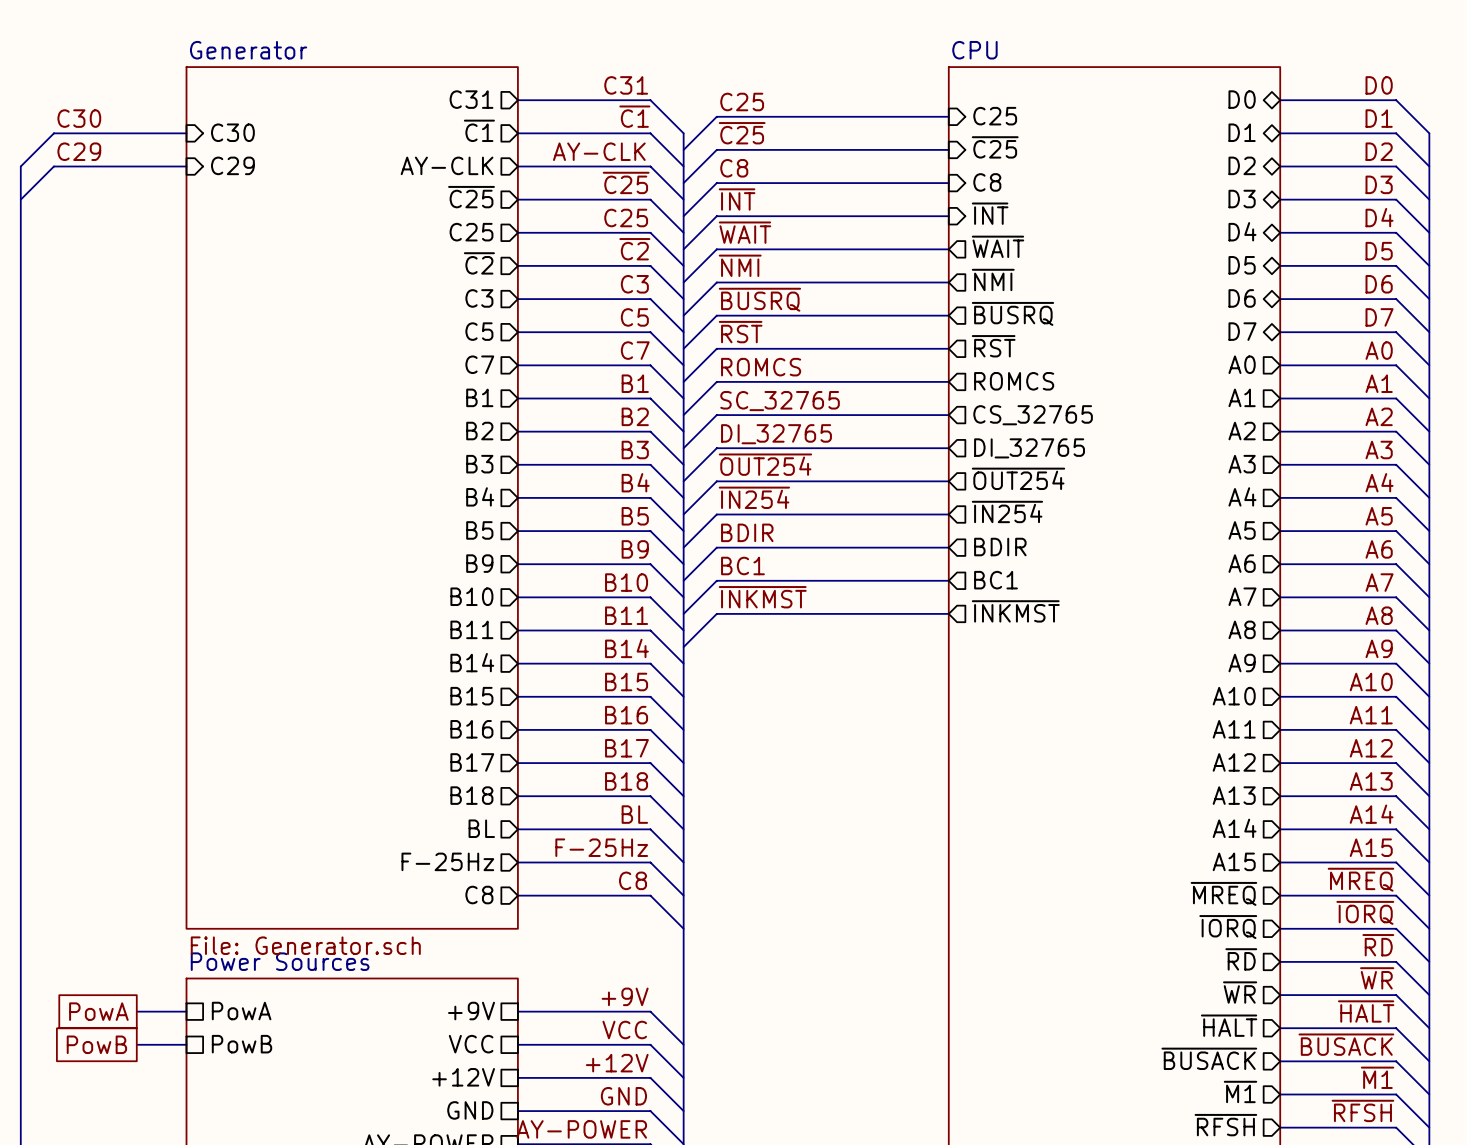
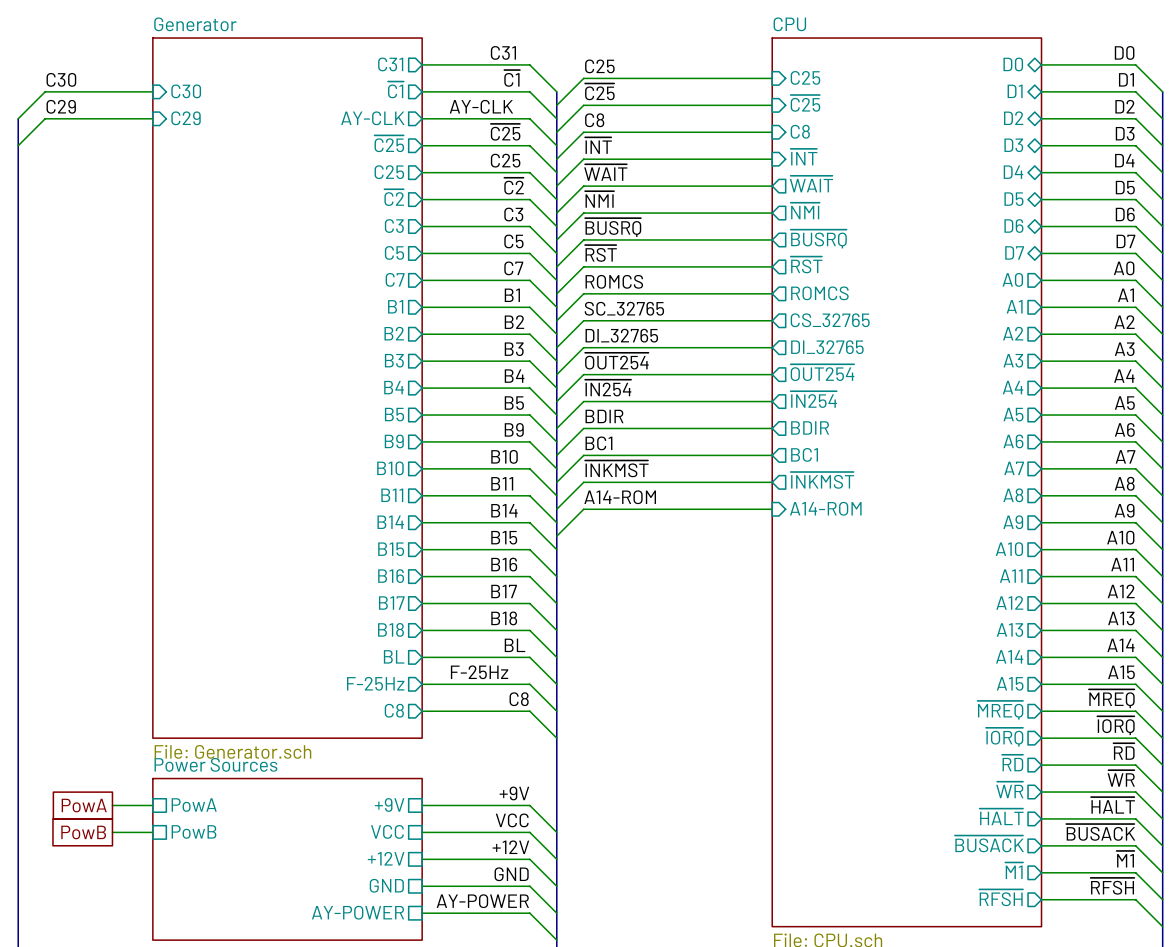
label: none -> A14-ROM (620, 497)
sheet pin: none -> A14-ROM (825, 508)
wire: none -> (772, 509) (583, 509) (556, 536)

